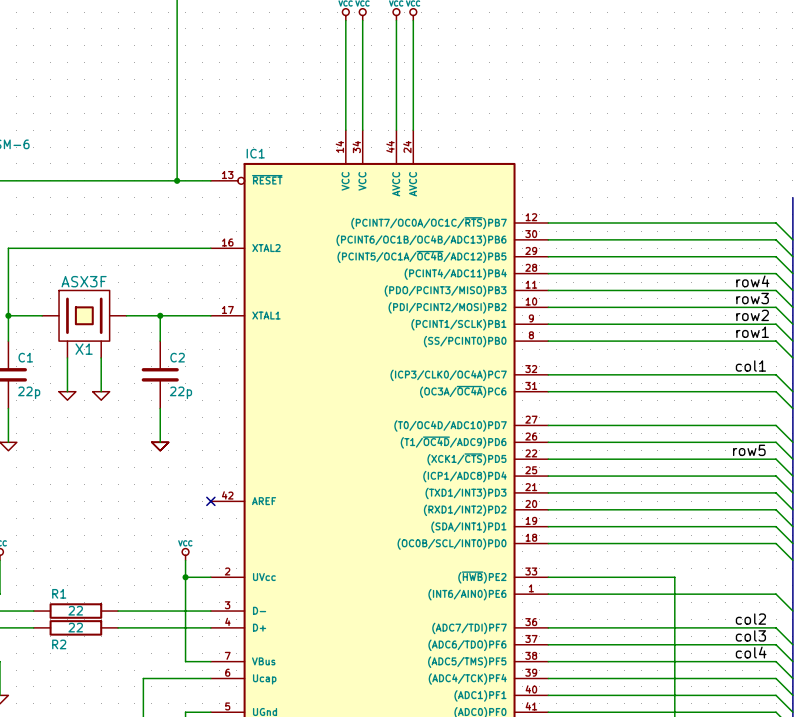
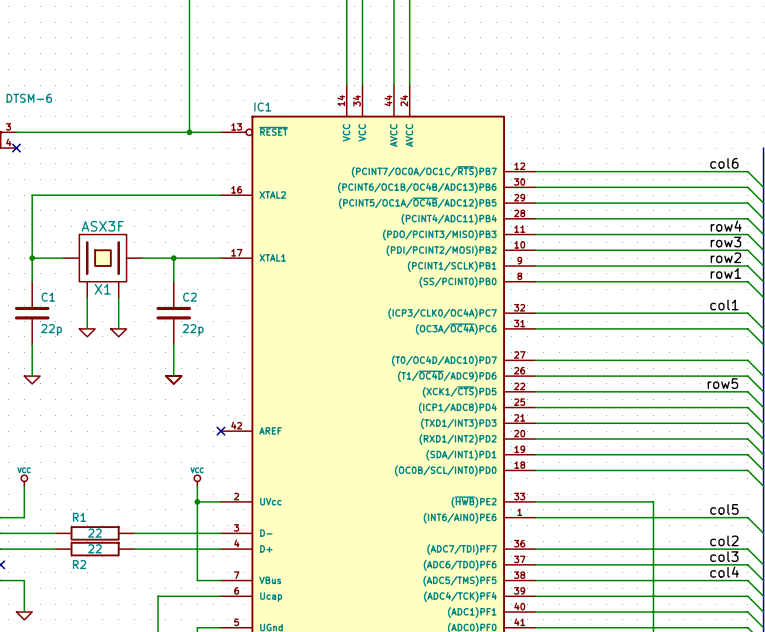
label: none -> col6 (724, 163)
label: none -> col5 (724, 509)

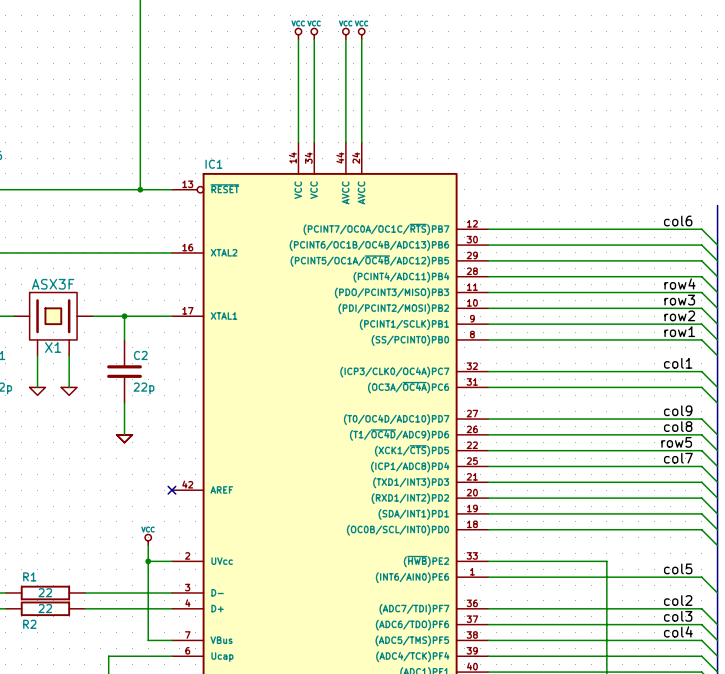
label: none -> col9 (678, 410)
label: none -> col8 (678, 426)
label: none -> col7 (678, 458)

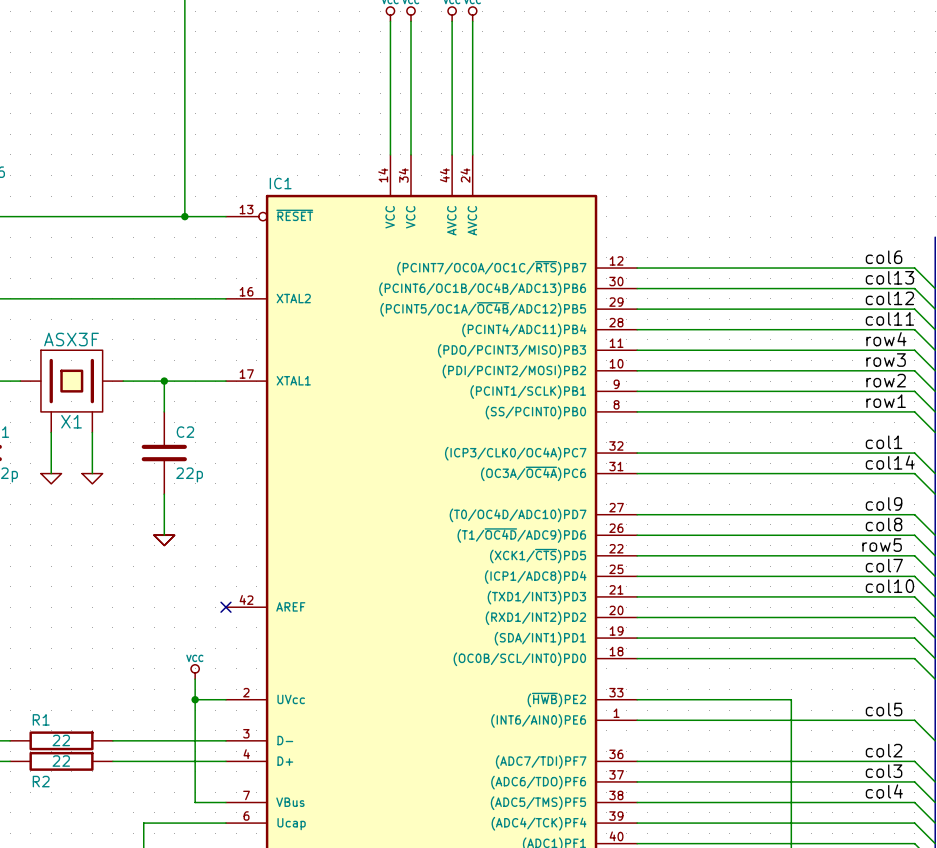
label: none -> col13 (889, 277)
label: none -> col12 (889, 298)
label: none -> col11 (889, 318)
label: none -> col14 (890, 462)
label: none -> col10 (889, 586)

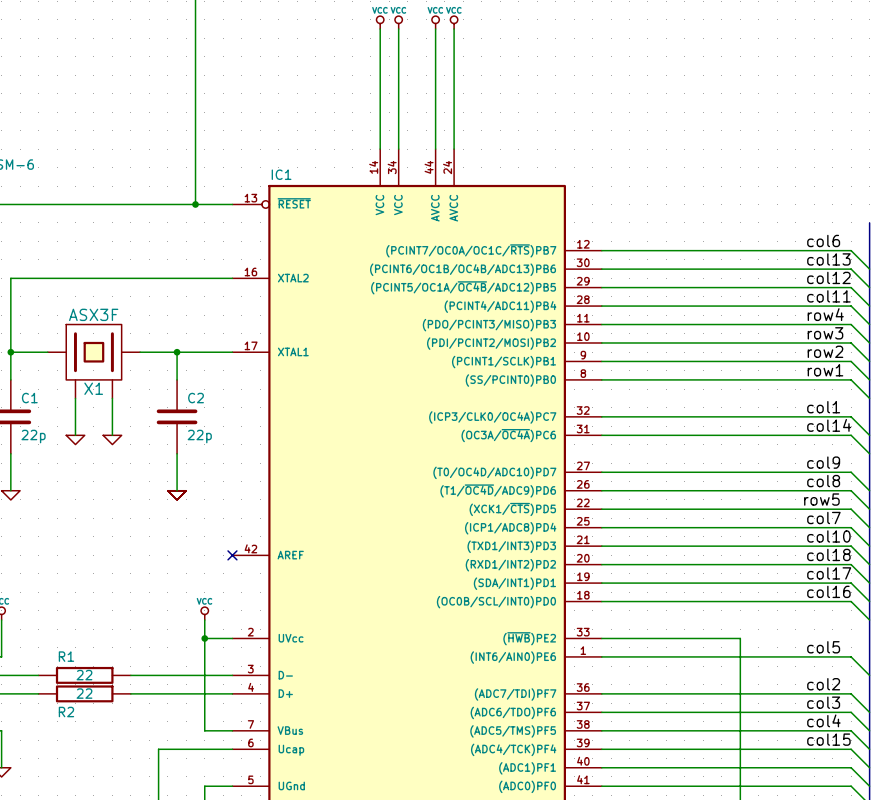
label: none -> col18 (828, 554)
label: none -> col17 (829, 573)
label: none -> col16 (828, 591)
label: none -> col15 (828, 739)

